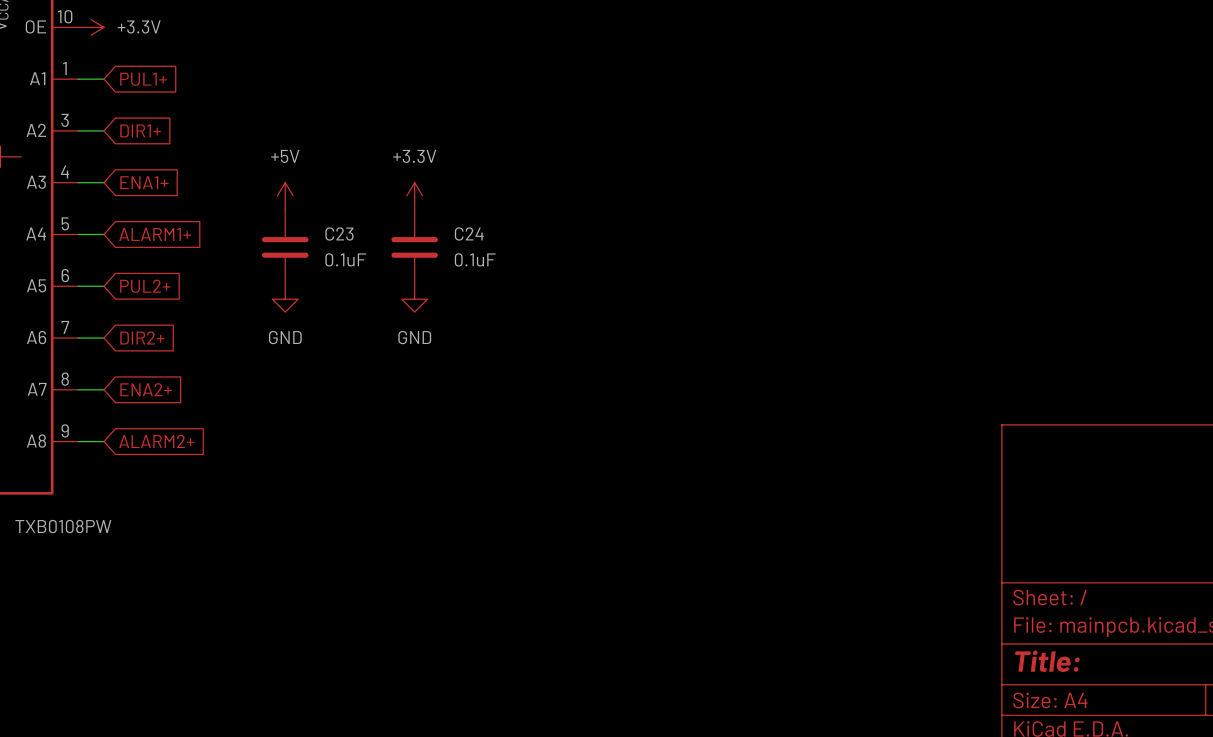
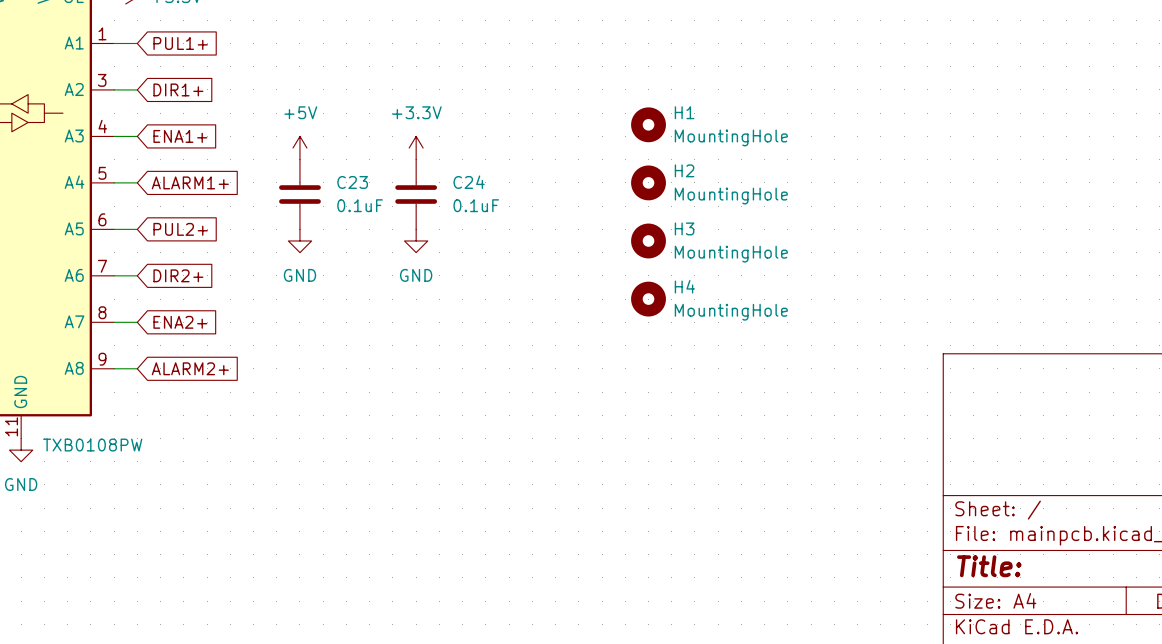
H1: none -> MountingHole (648, 124)
H2: none -> MountingHole (648, 182)
H3: none -> MountingHole (648, 240)
H4: none -> MountingHole (648, 299)

